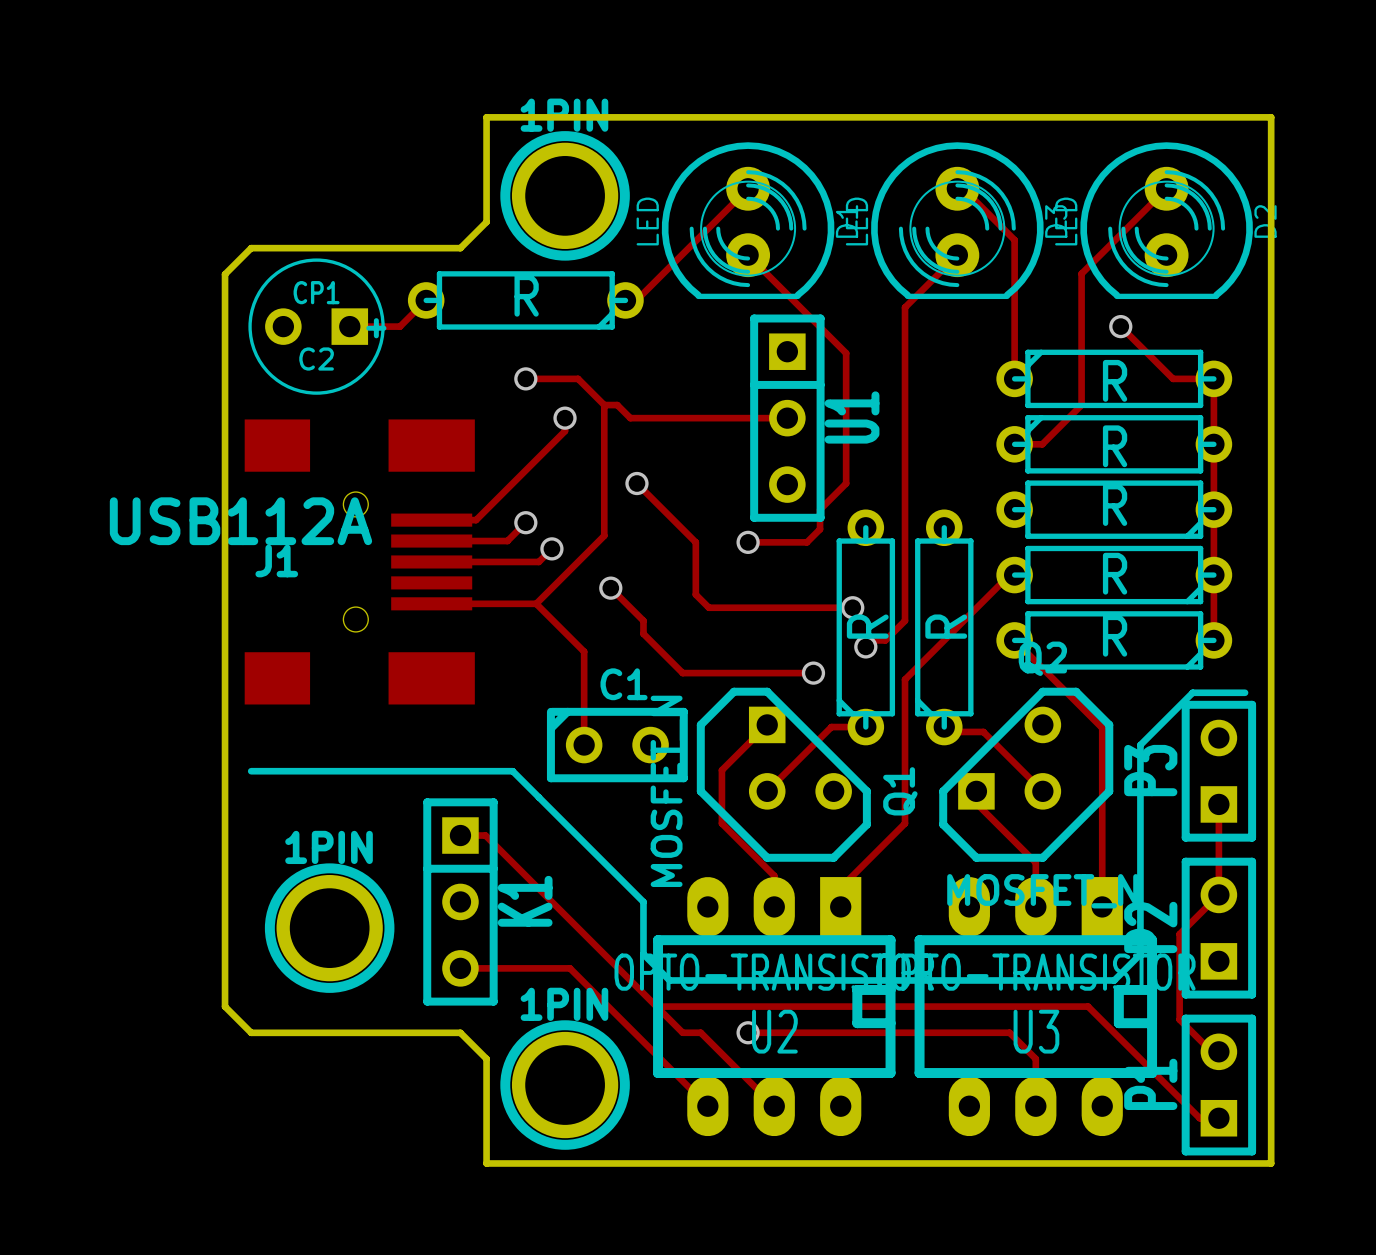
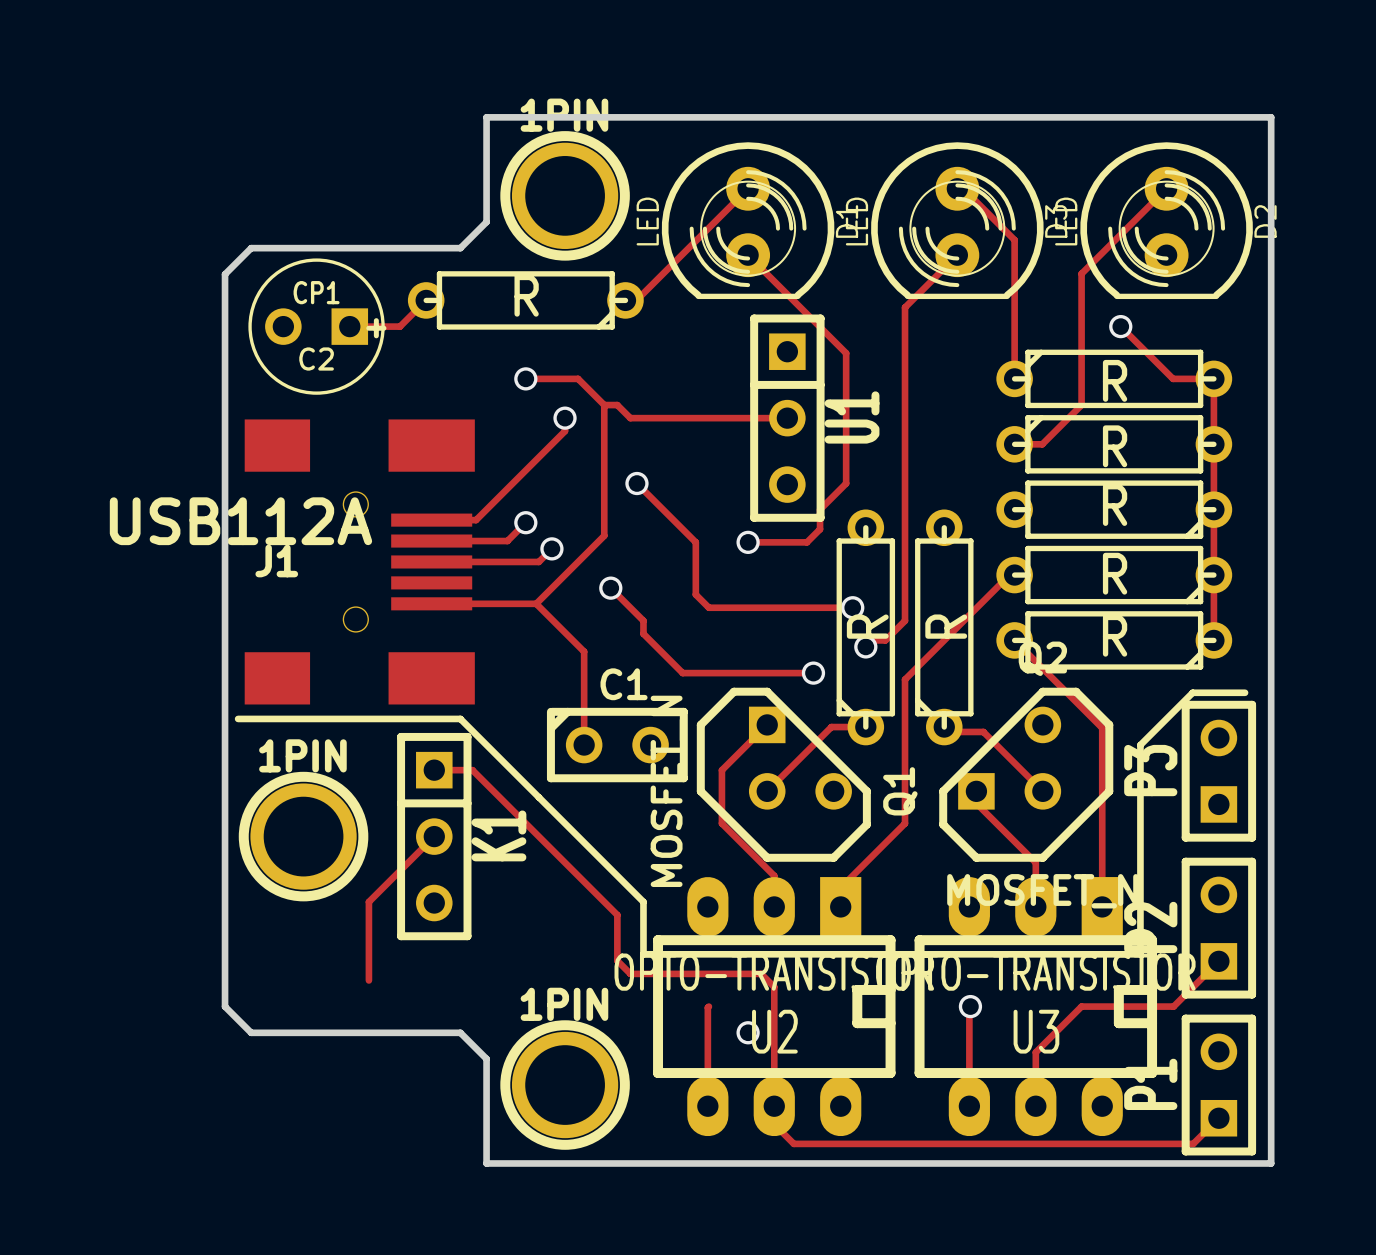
track: none -> (434, 770) (472, 770) (617, 915) (617, 960) (630, 973) (761, 973) (774, 986) (774, 1124) (793, 1143) (1193, 1143) (1218, 1118)
line: (251, 771) (512, 771) -> (238, 718) (460, 718) (512, 771)
track: (1218, 804) (1218, 894) (1179, 934) (1179, 1019) (1211, 1051) (1218, 1051) -> none
track: (460, 835) (485, 835) (682, 1032) (700, 1032) (774, 1106) -> none
track: none -> (434, 836) (368, 901) (368, 980)
K1 position: (460, 901) -> (434, 836)
1PIN position: (329, 928) -> (303, 836)
line: (643, 954) (669, 980) (1114, 980) (1140, 954) -> (643, 954) (1140, 954)
track: (460, 968) (570, 968) (707, 1106) -> (708, 1006) (707, 1106)
track: (656, 1006) (1081, 1006) -> none
track: none -> (970, 1006) (969, 1106)
via: none -> (970, 1006)
track: (1088, 1006) (1199, 1118) (1218, 1118) -> (1088, 1006) (1173, 1006) (1218, 961)
track: (748, 1032) (1009, 1032) (1035, 1058) -> (1081, 1006) (1035, 1052) (1035, 1058)

